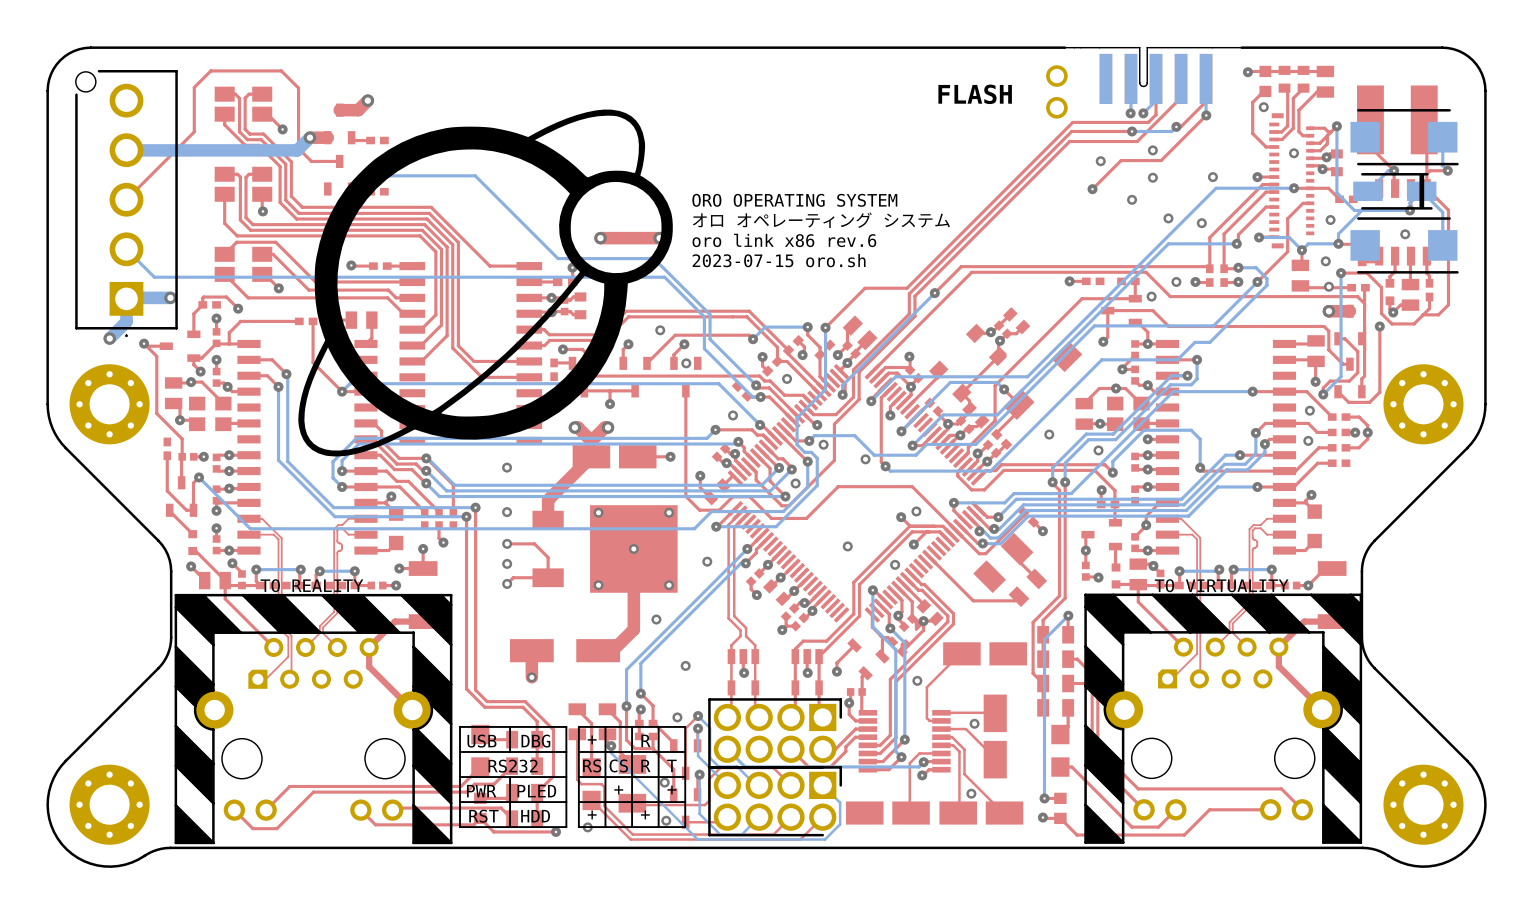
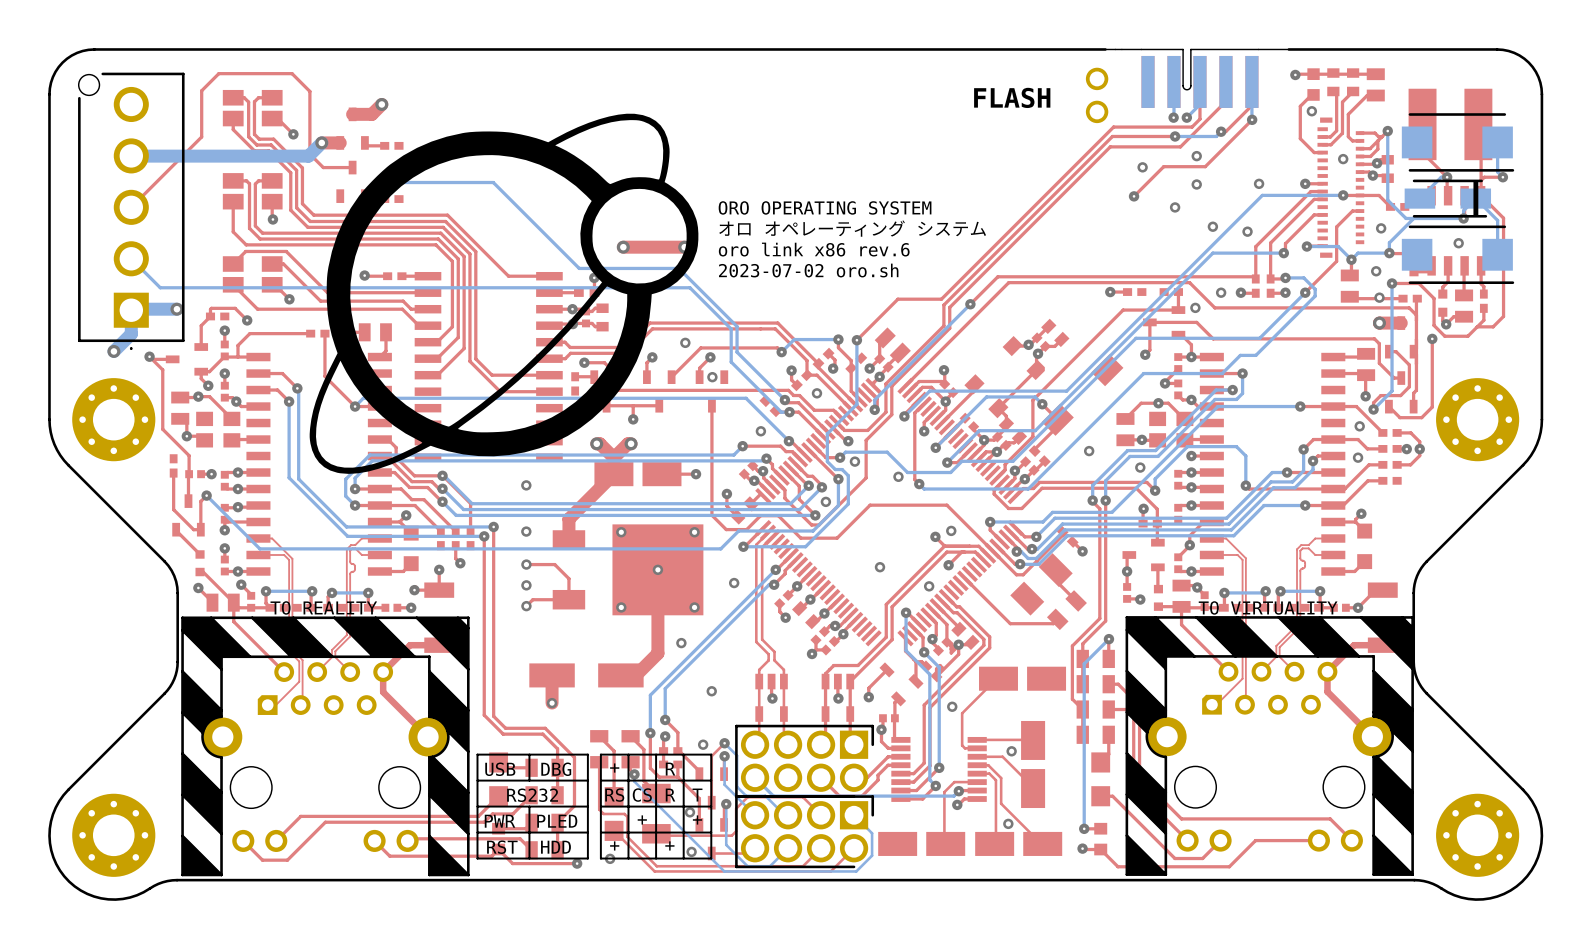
text: 2023-07-15 oro.sh (779, 260) -> 2023-07-02 oro.sh (808, 270)

